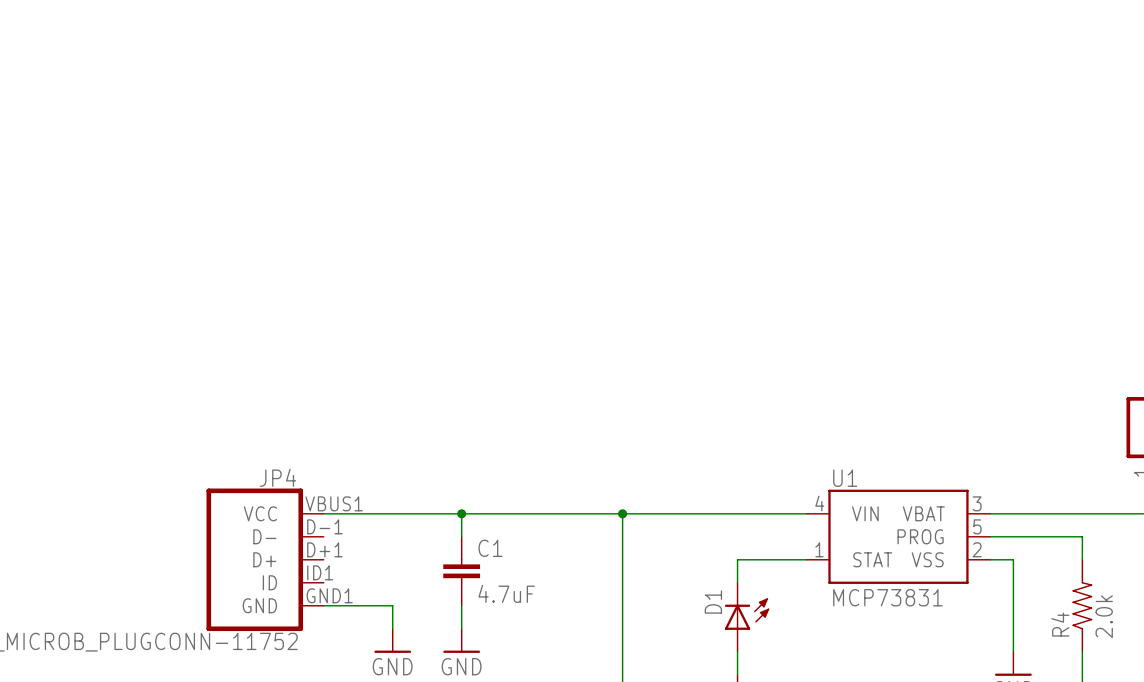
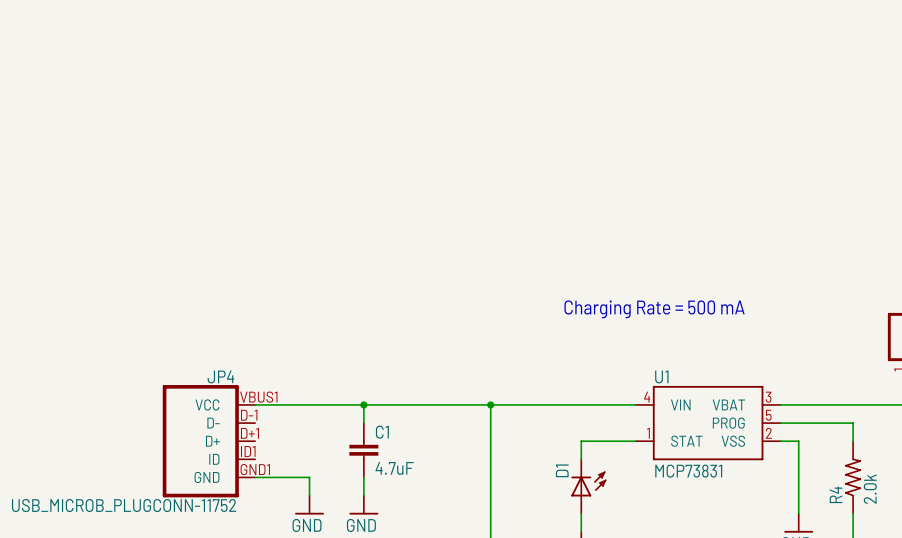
text: none -> Charging Rate = 500 mA (654, 309)

